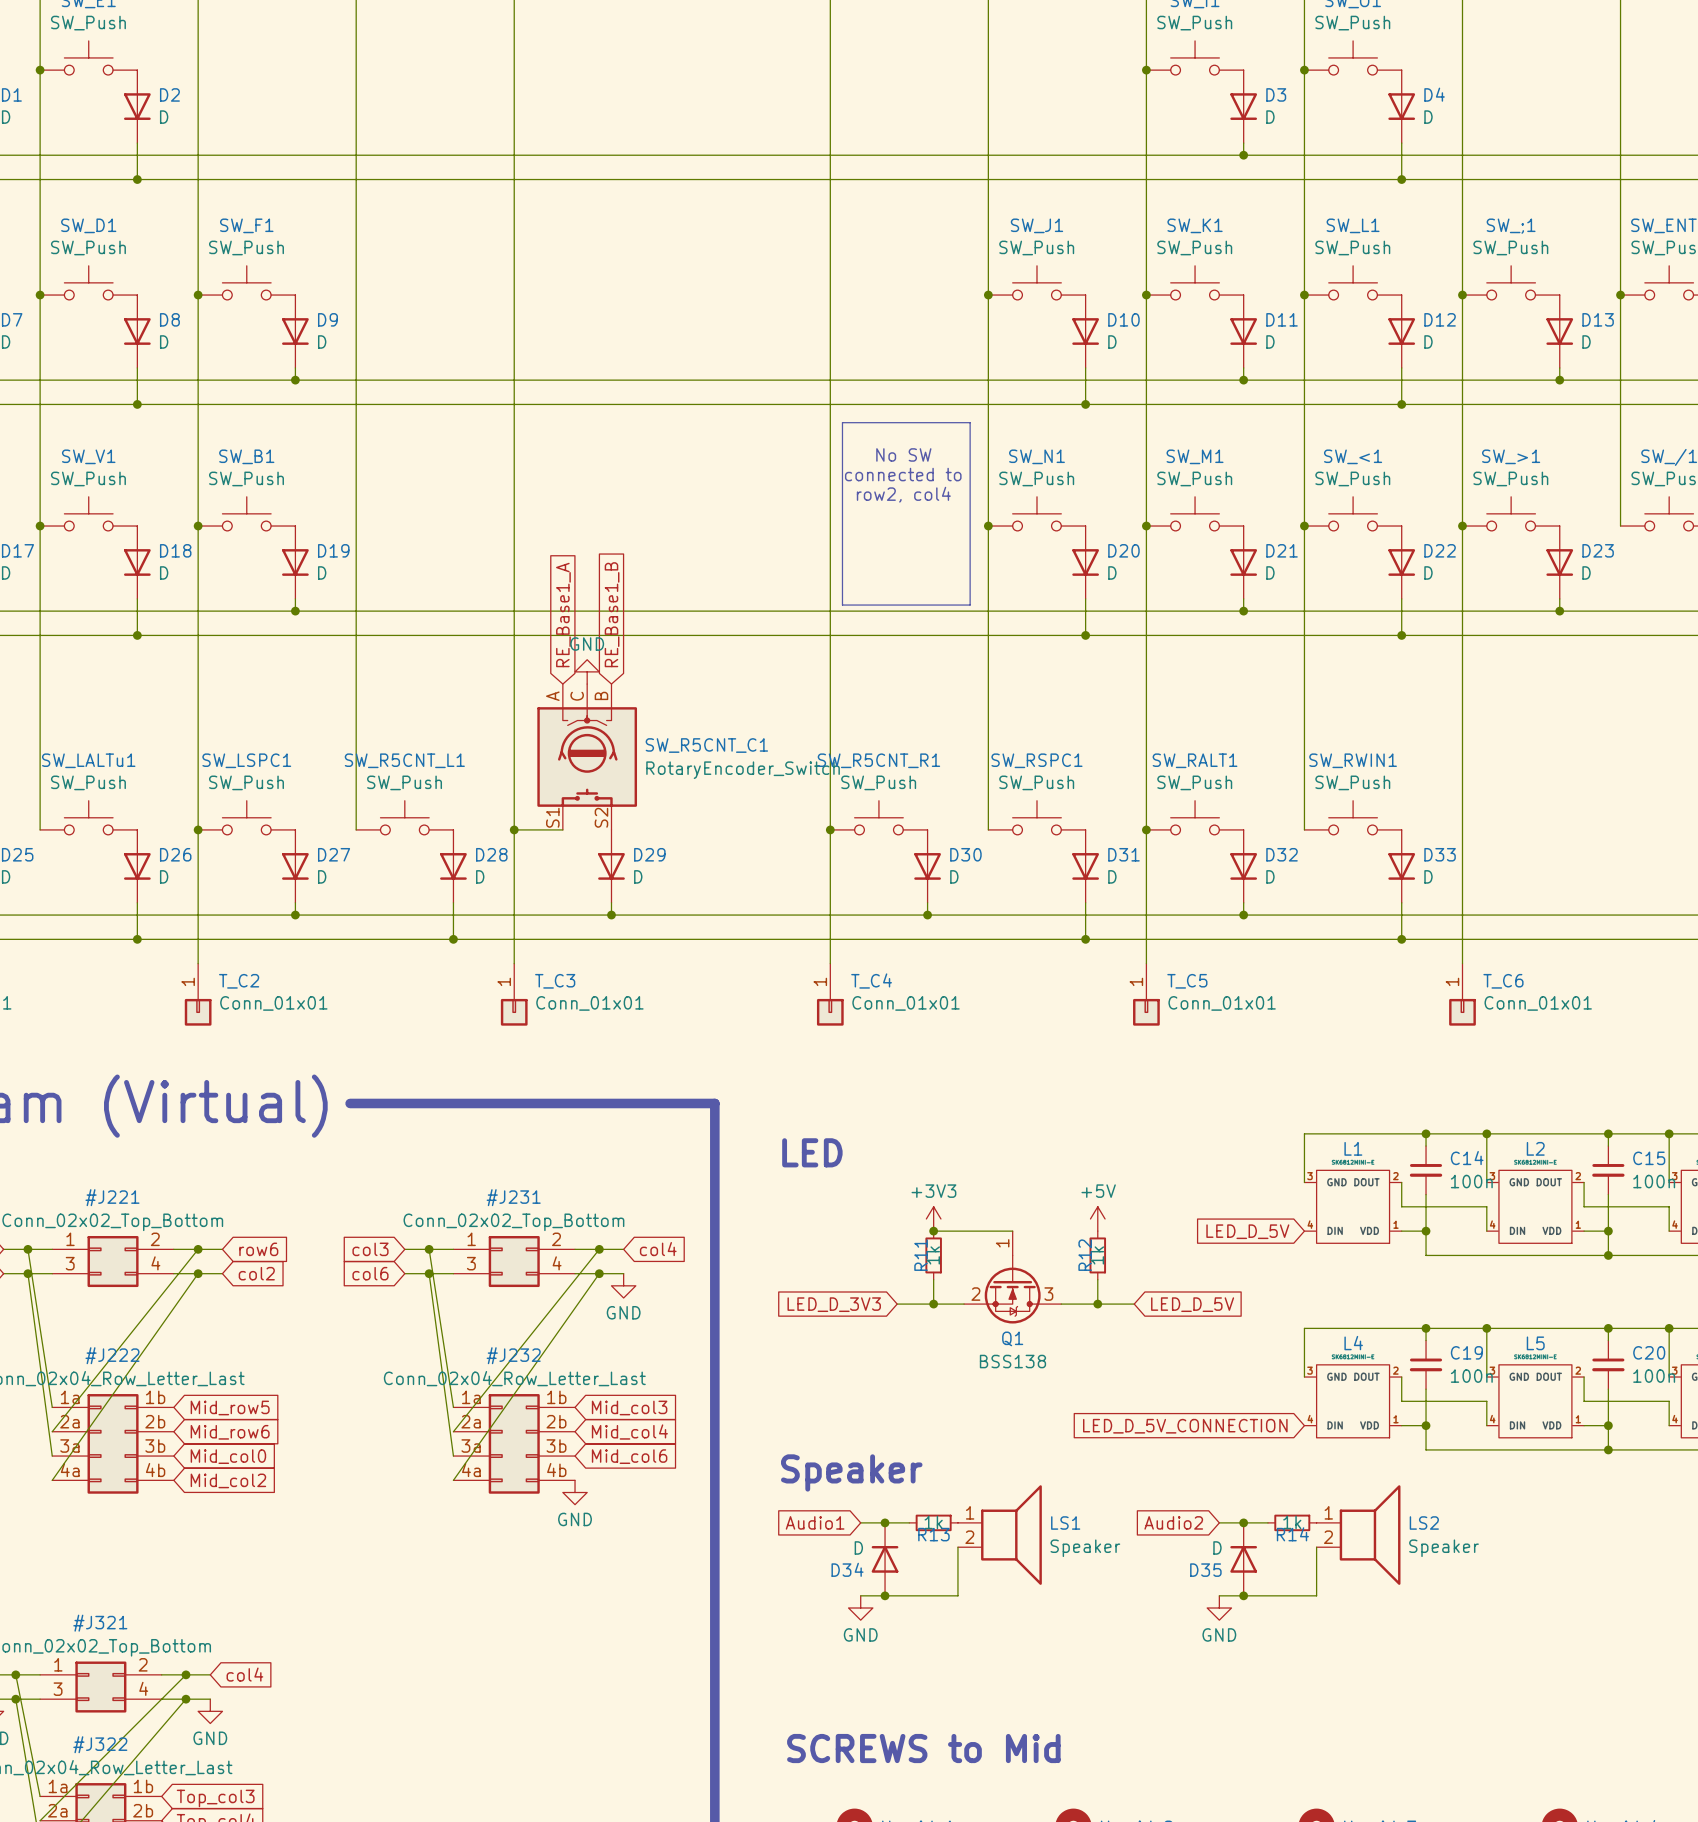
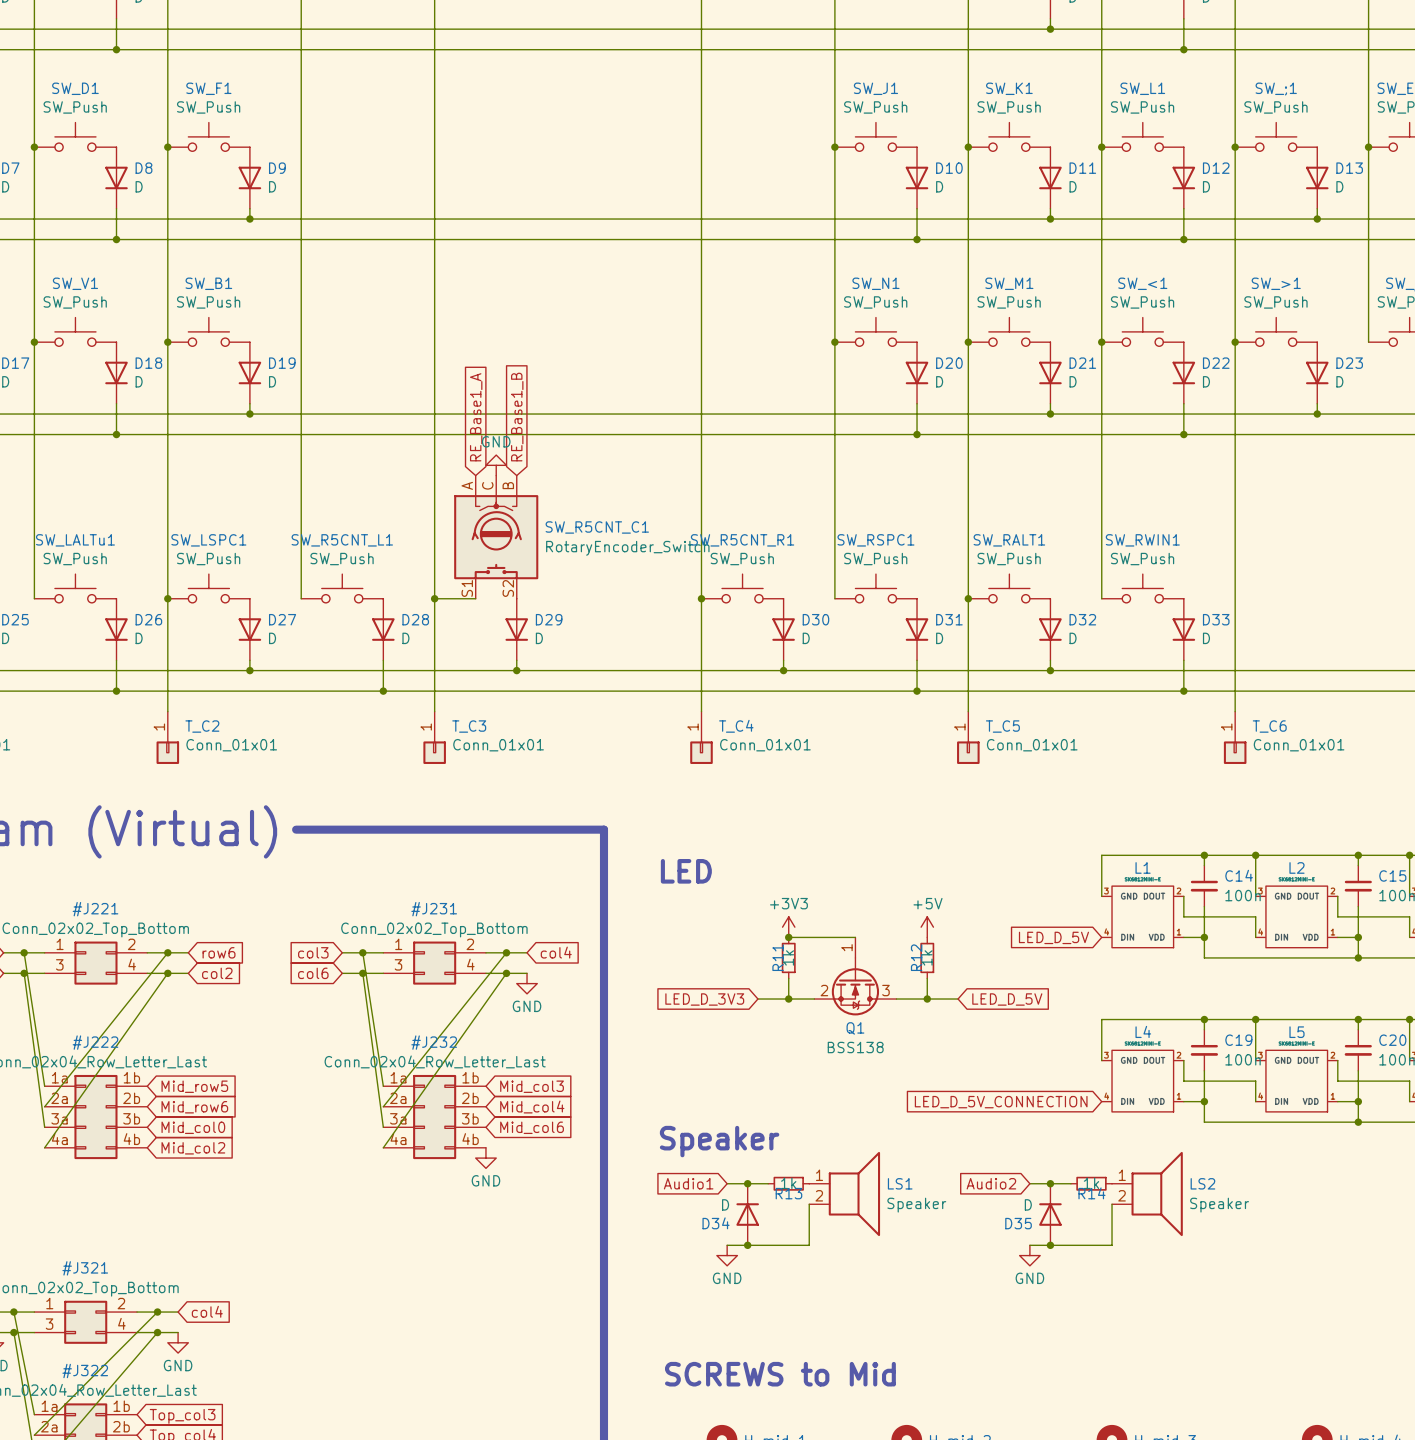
line: (842, 422) (970, 422) (970, 605) (842, 605) (842, 422) -> none
text: No SW (903, 454) -> none
text: connected to (903, 474) -> none
text: row2, col4 (903, 494) -> none

